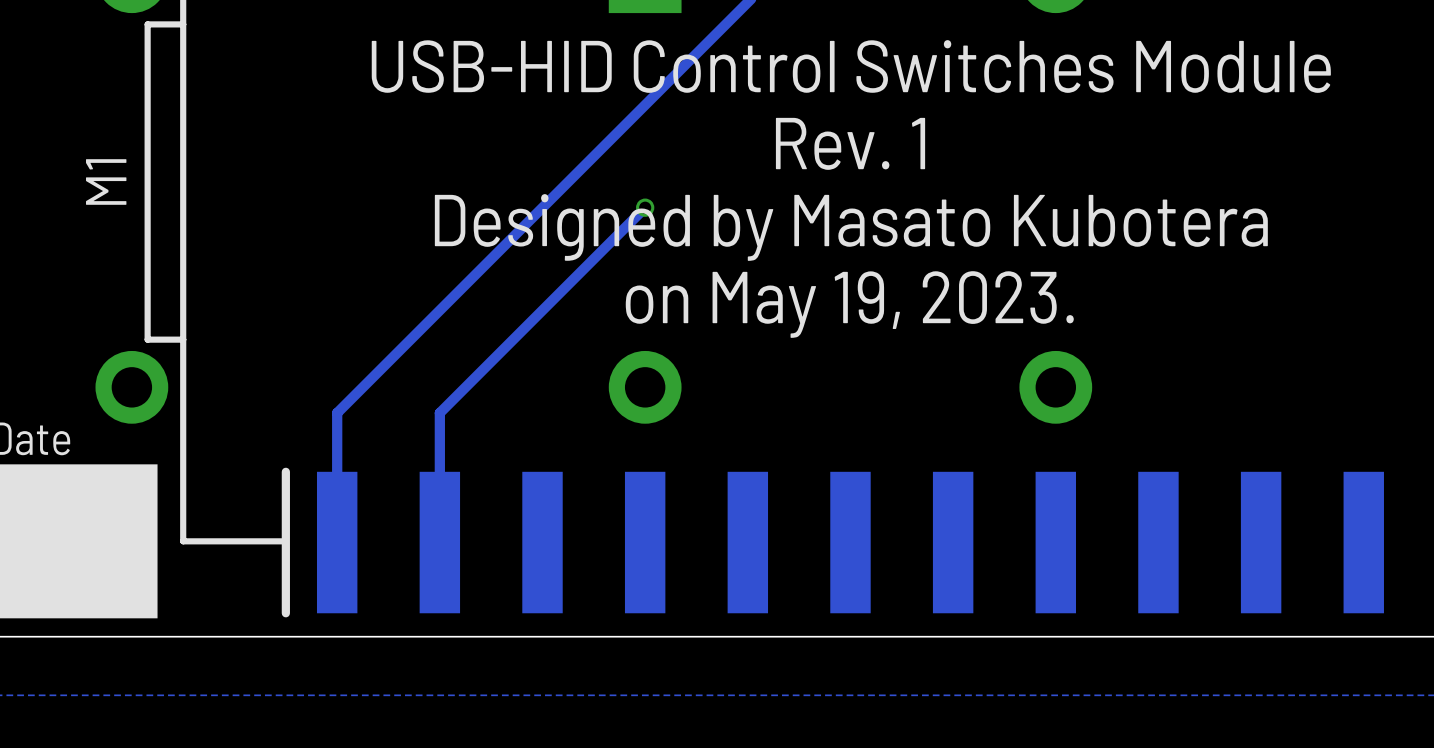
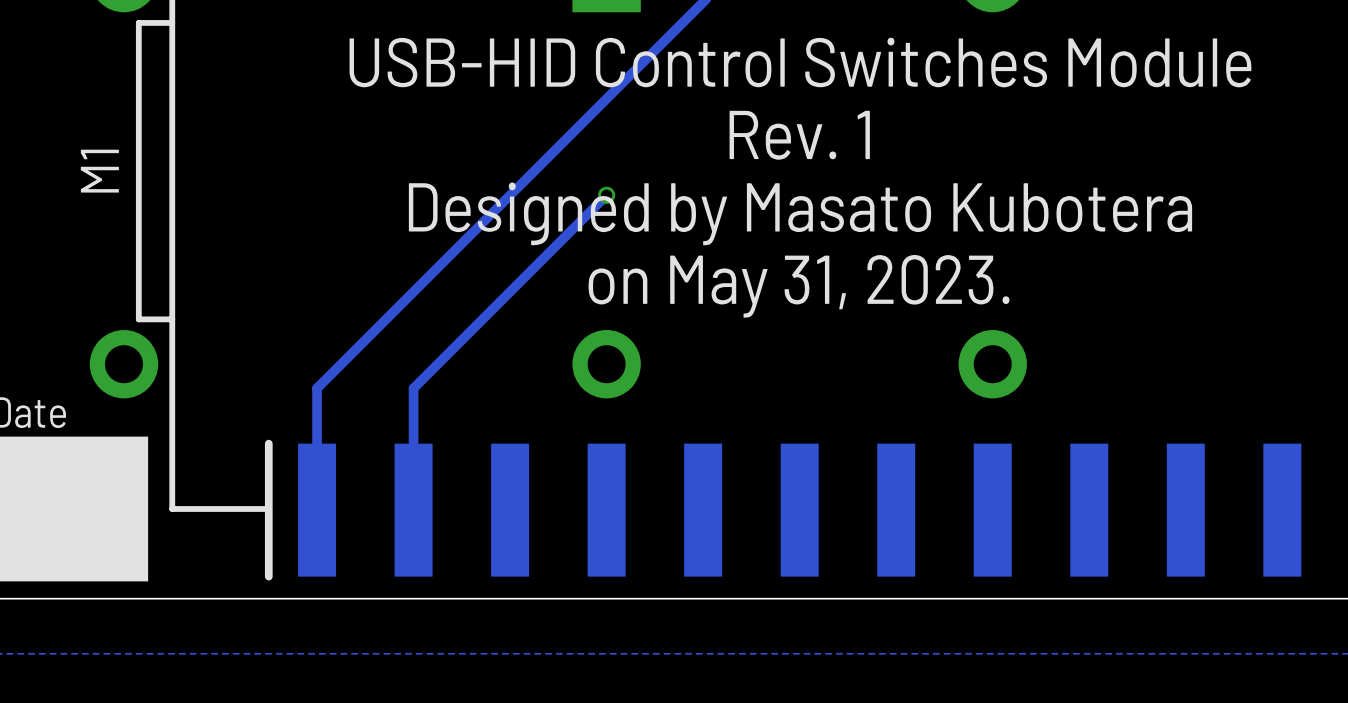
text: on May 19, 2023. (849, 304) -> on May 31, 2023. (799, 286)

